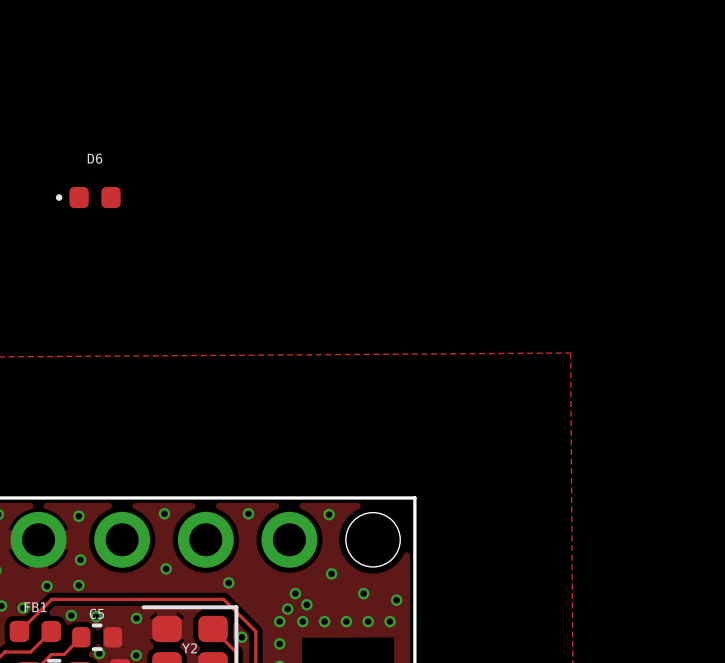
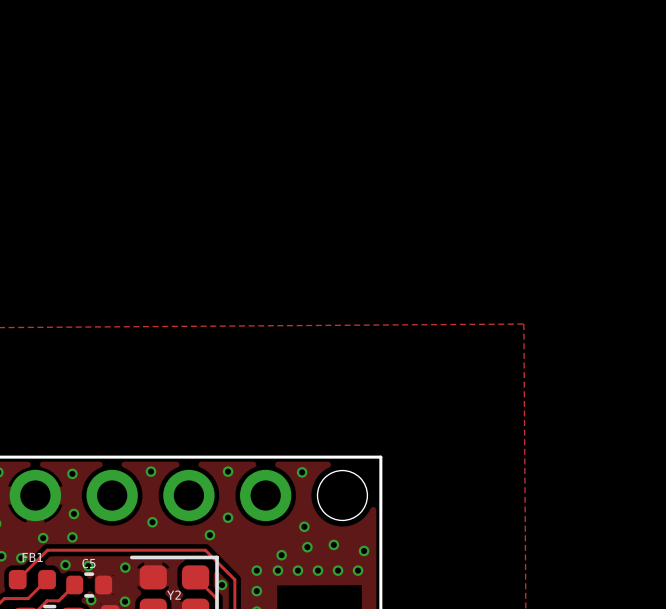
D6: (88, 197) -> none
via: none -> (228, 517)
via: (295, 593) -> none
via: none -> (307, 547)
via: (287, 609) -> none

